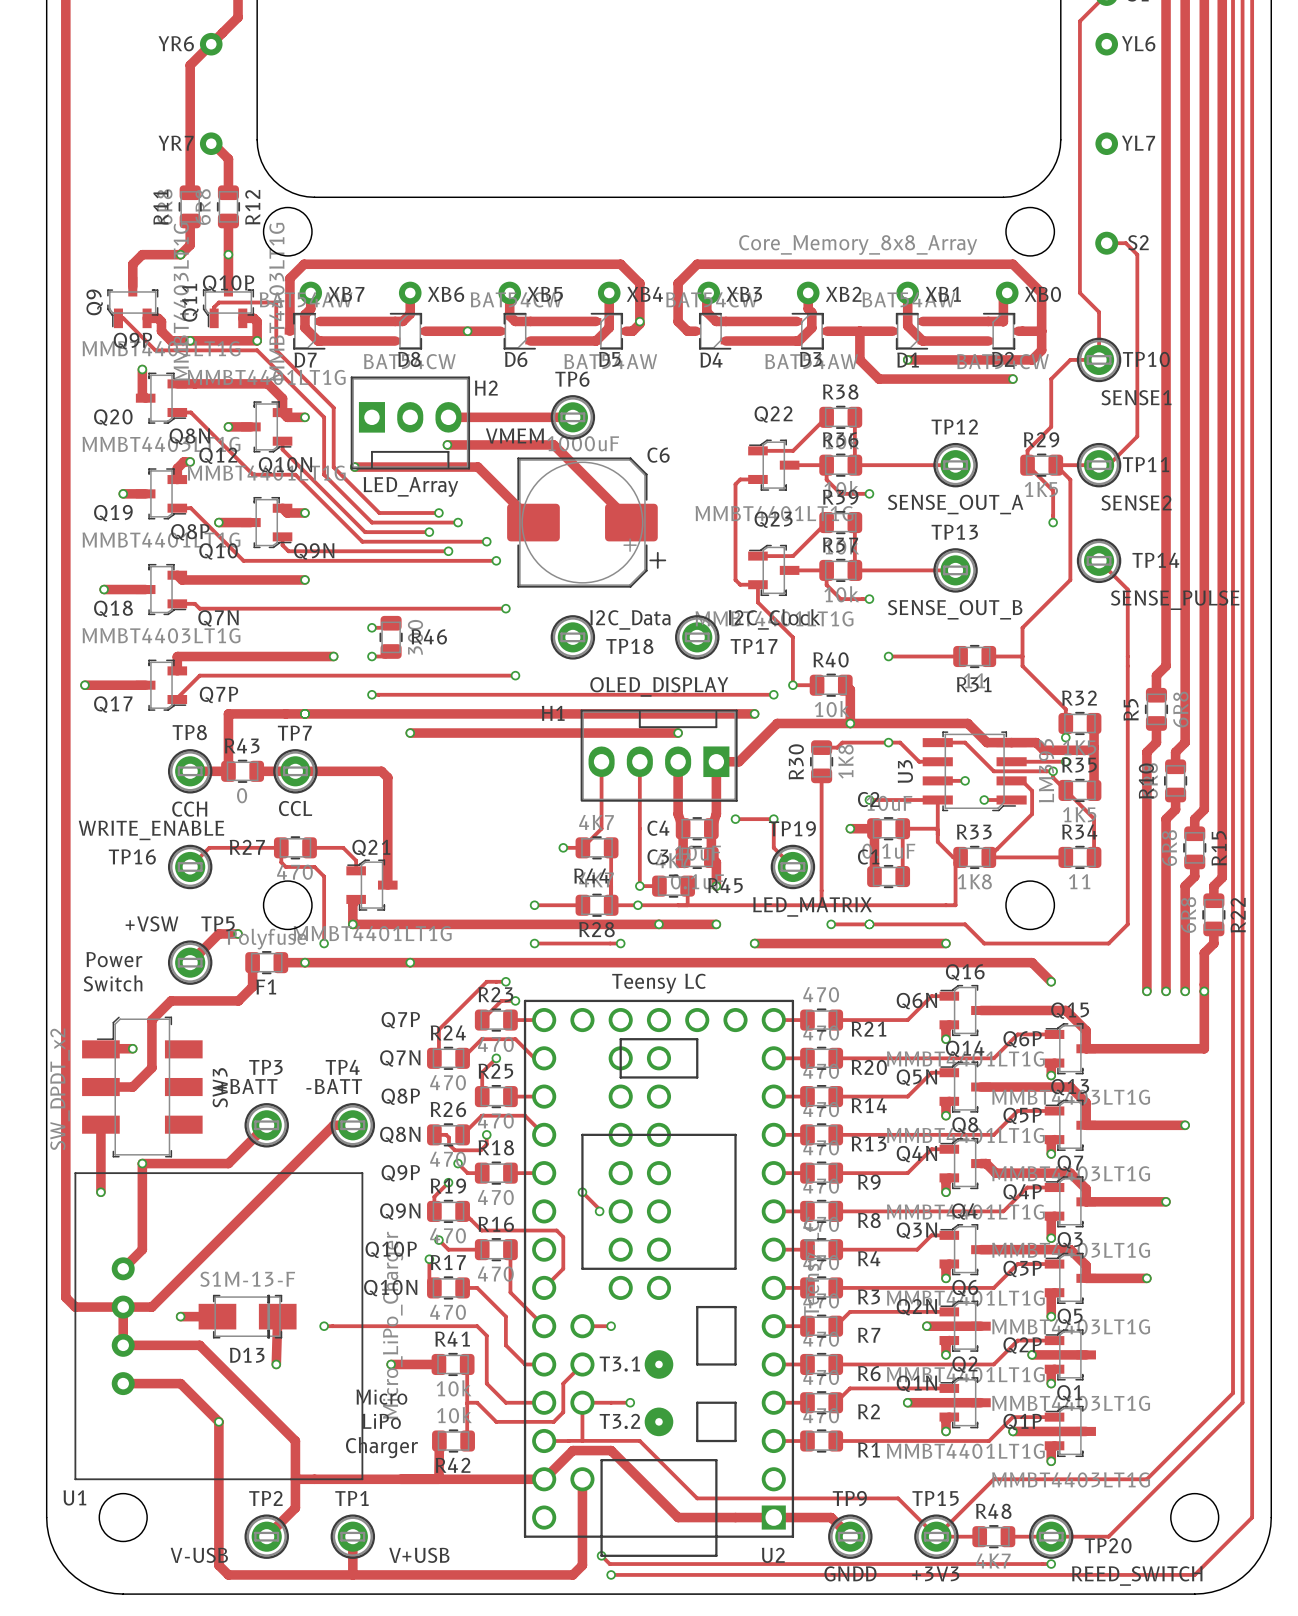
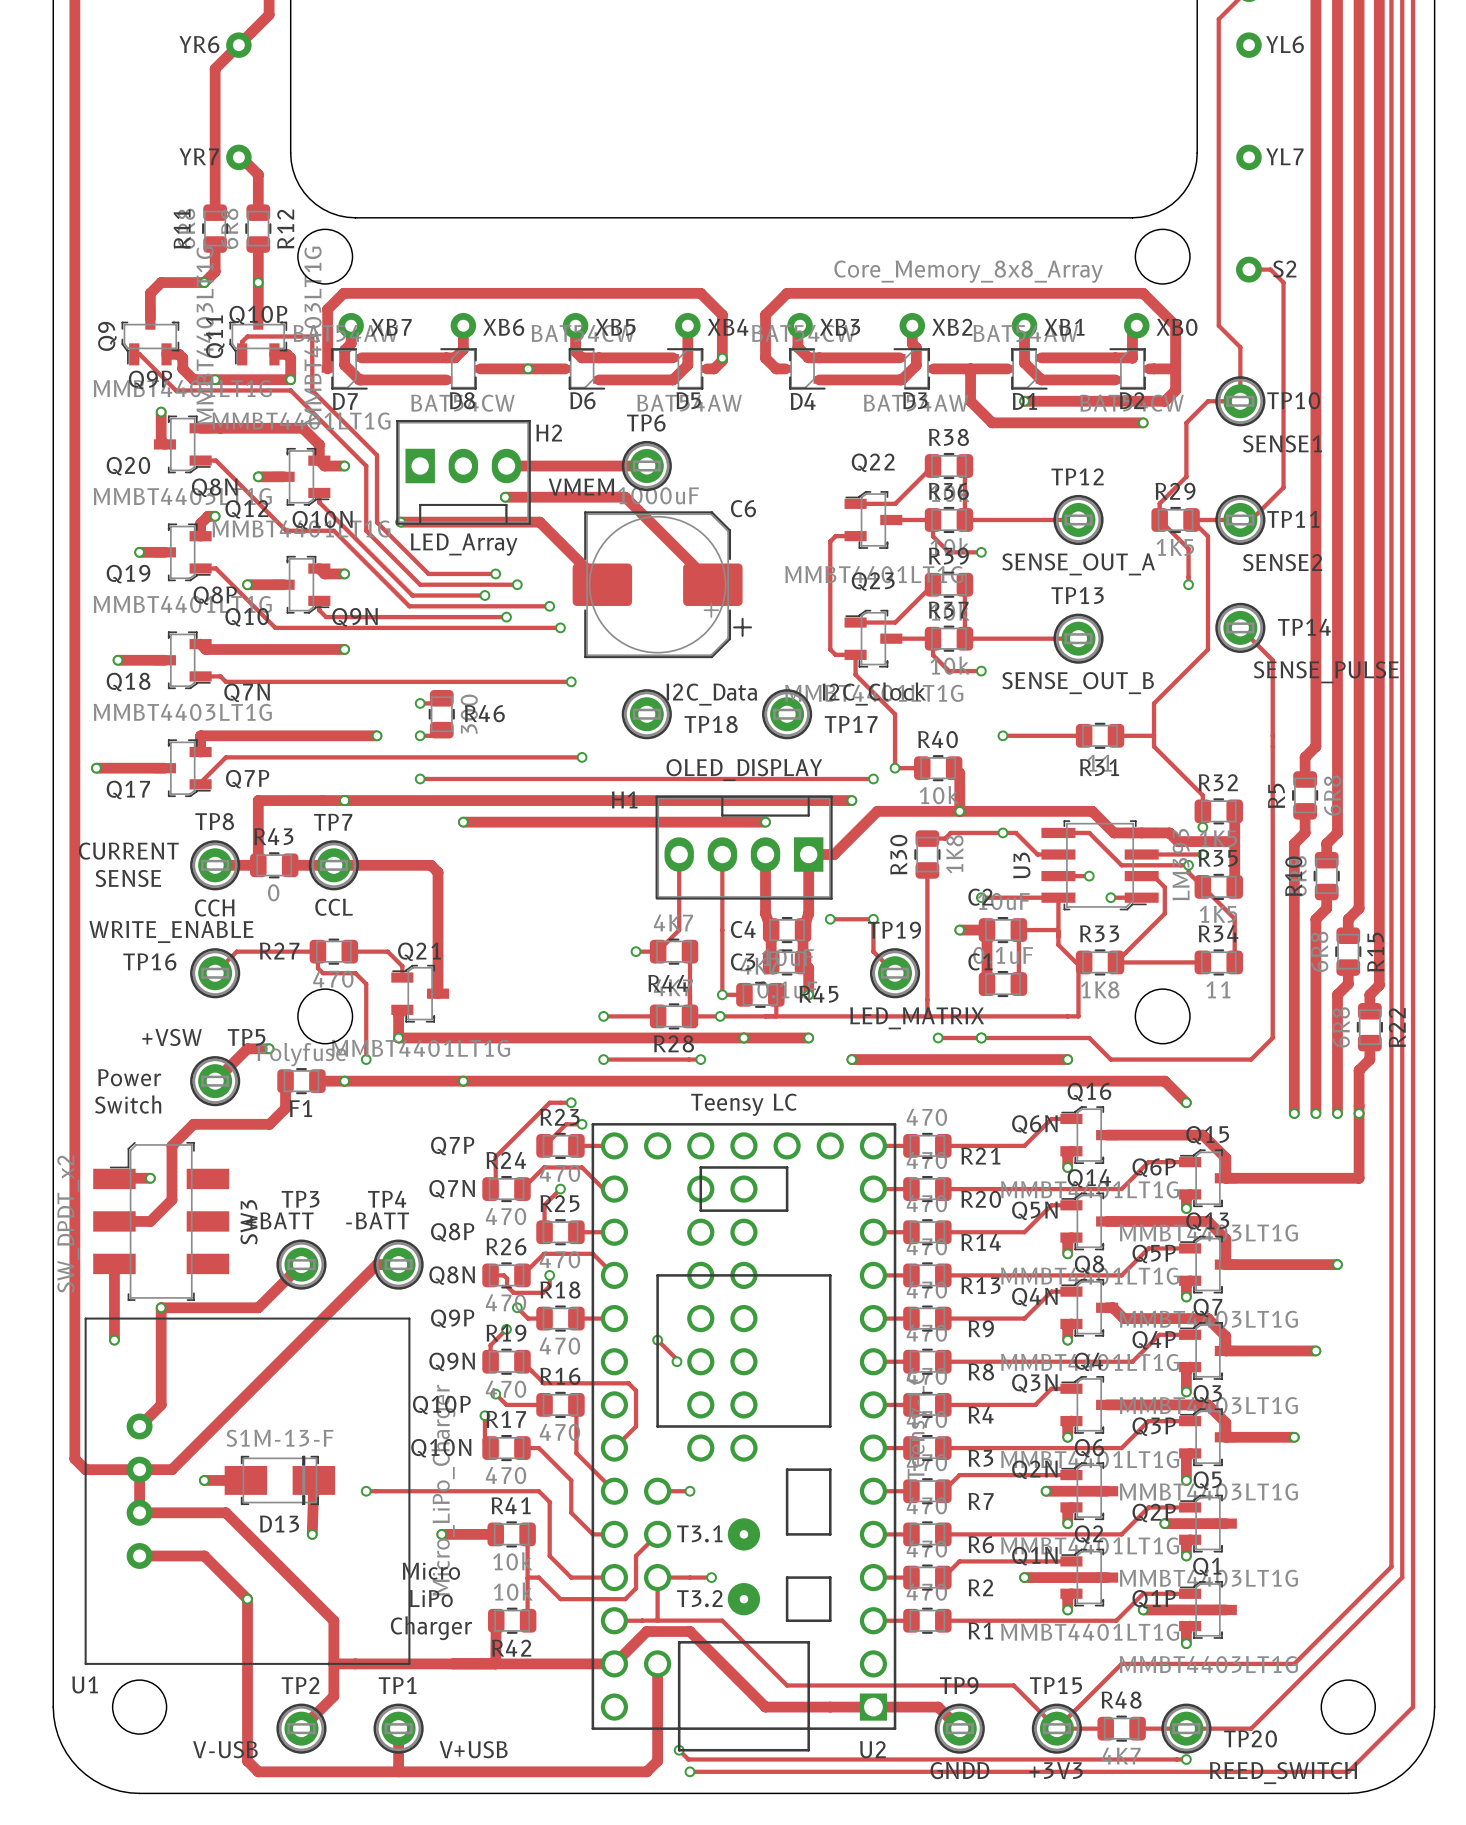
text: none -> CURRENT (128, 851)
text: none -> SENSE (128, 878)

